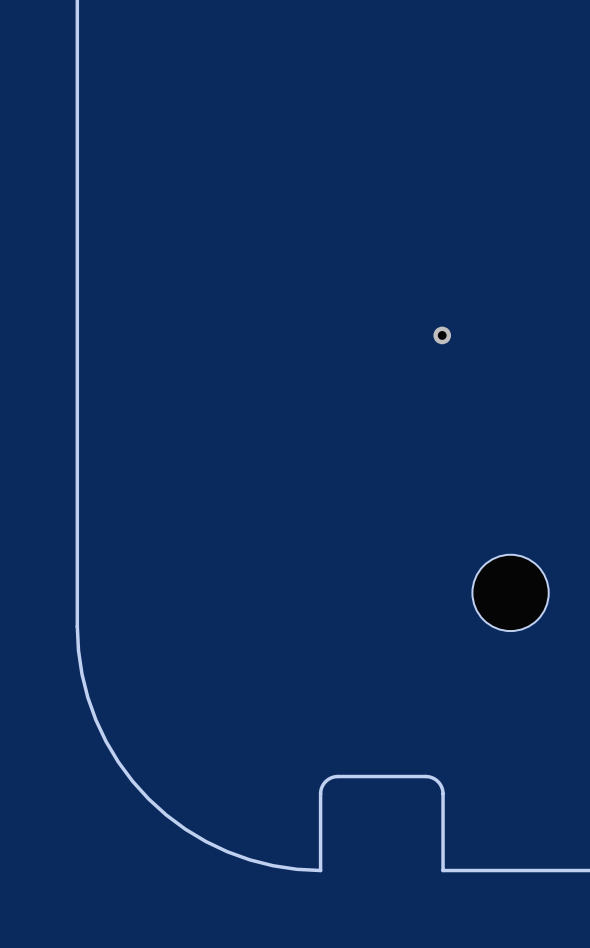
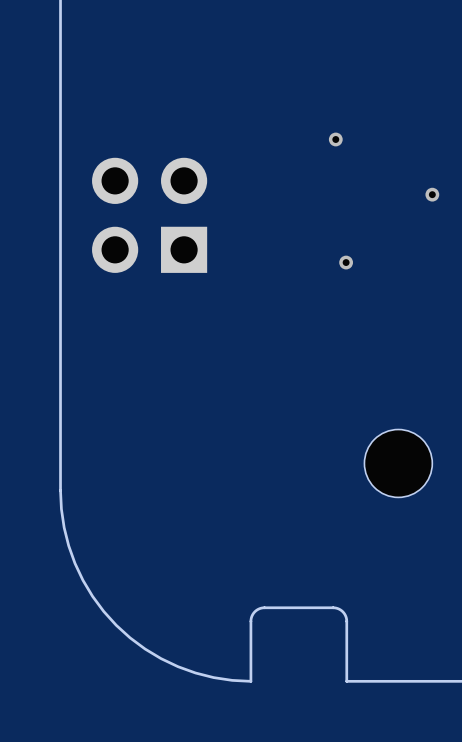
via: none -> (335, 139)
via: none -> (432, 194)
part: none -> (149, 215)
part footprint: [472, 554, 549, 632] -> [364, 429, 433, 498]

